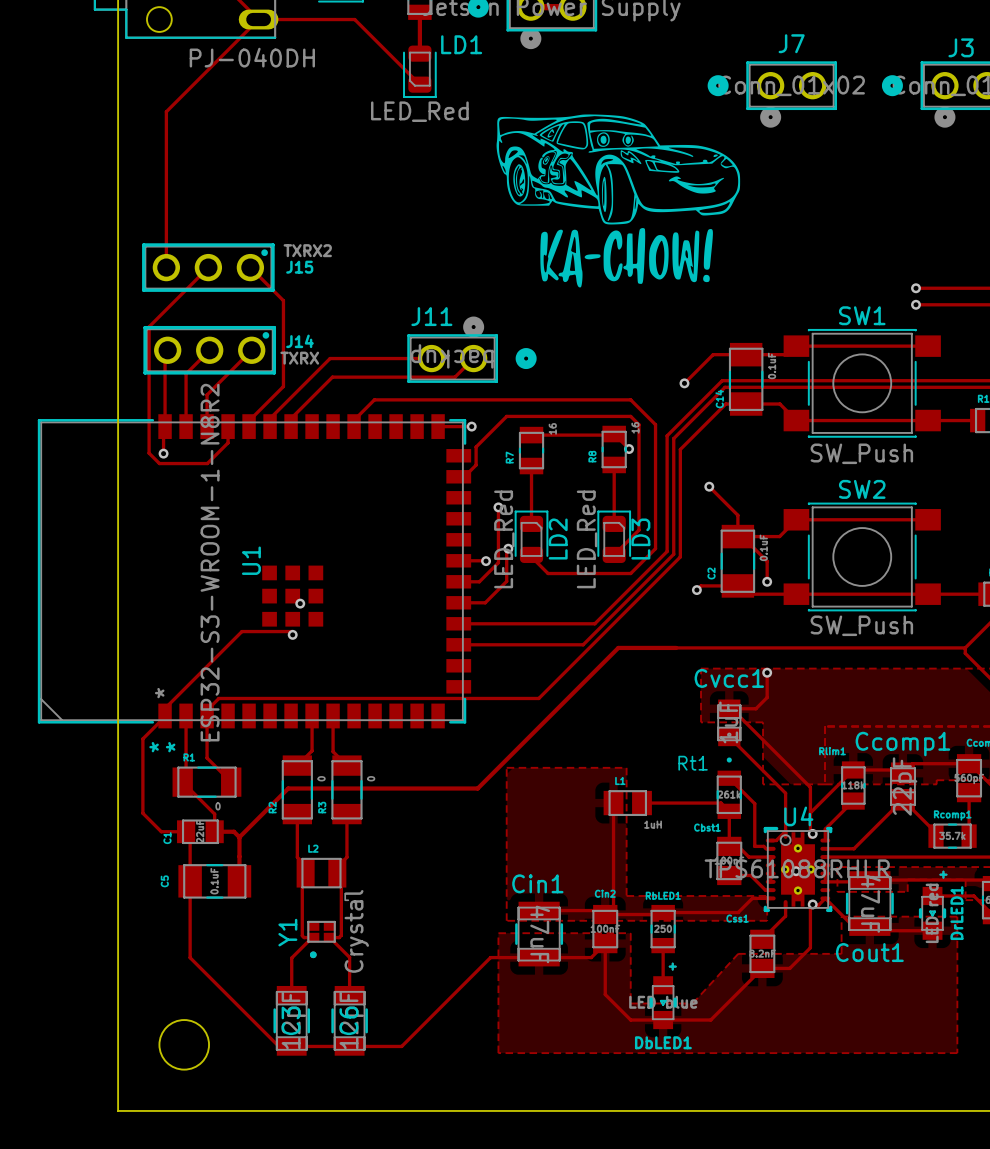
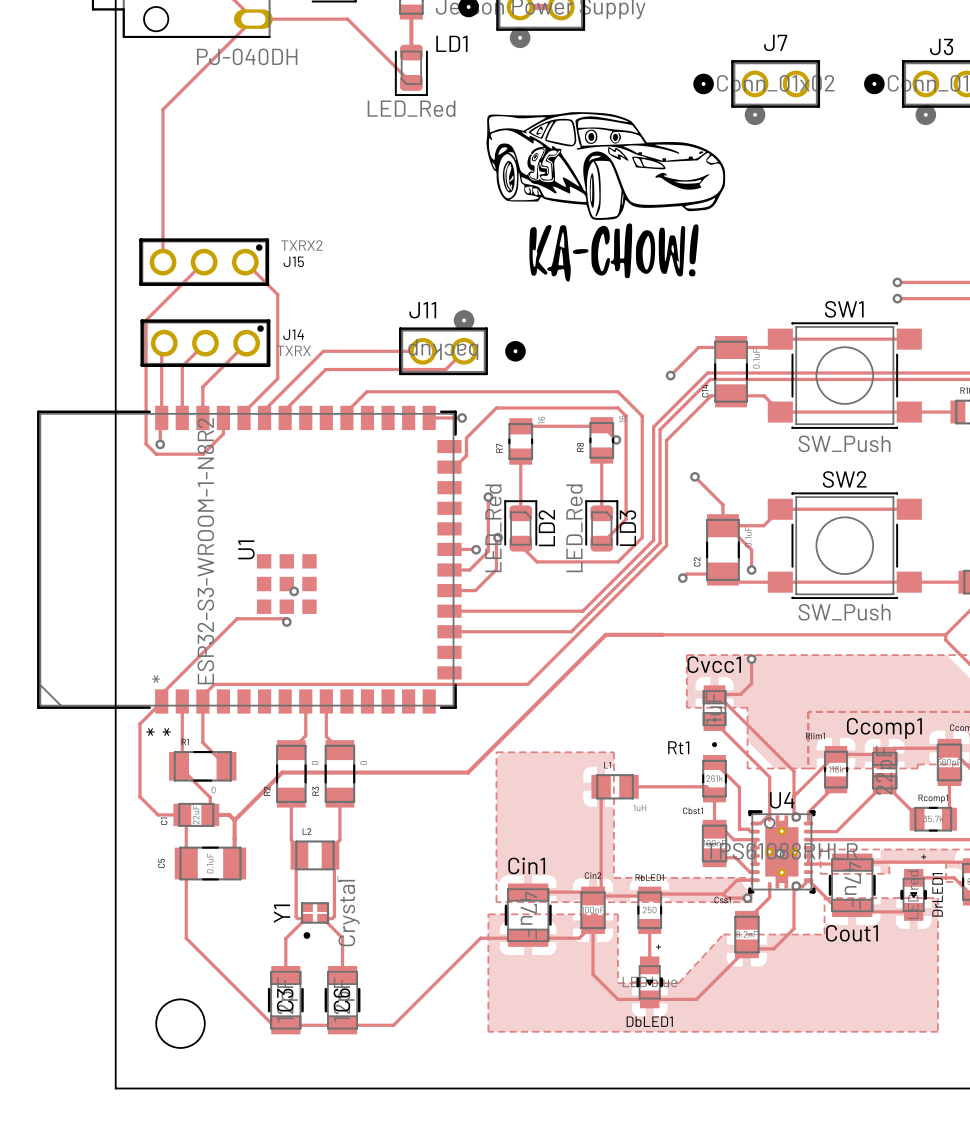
track: none -> (723, 894) (727, 898) (747, 898)
via: none -> (747, 898)

